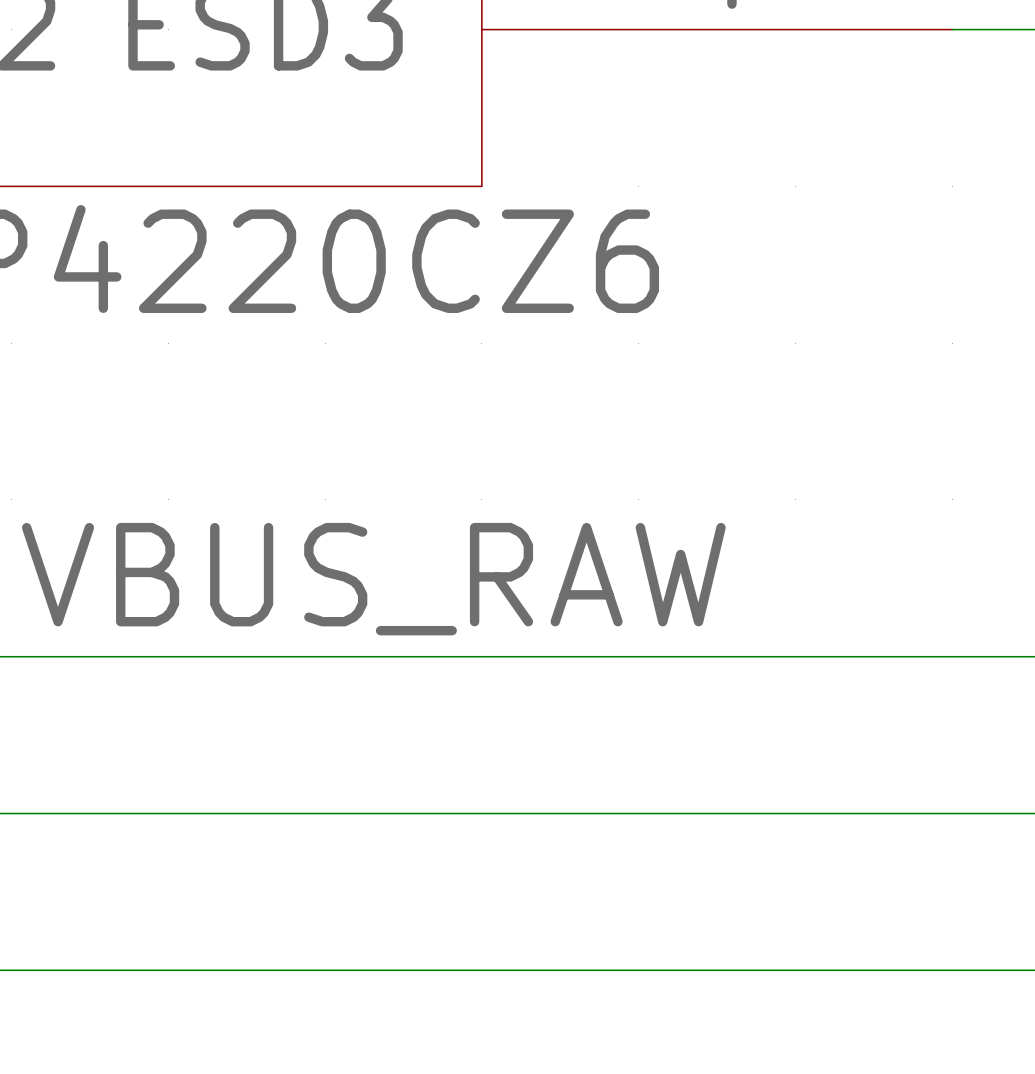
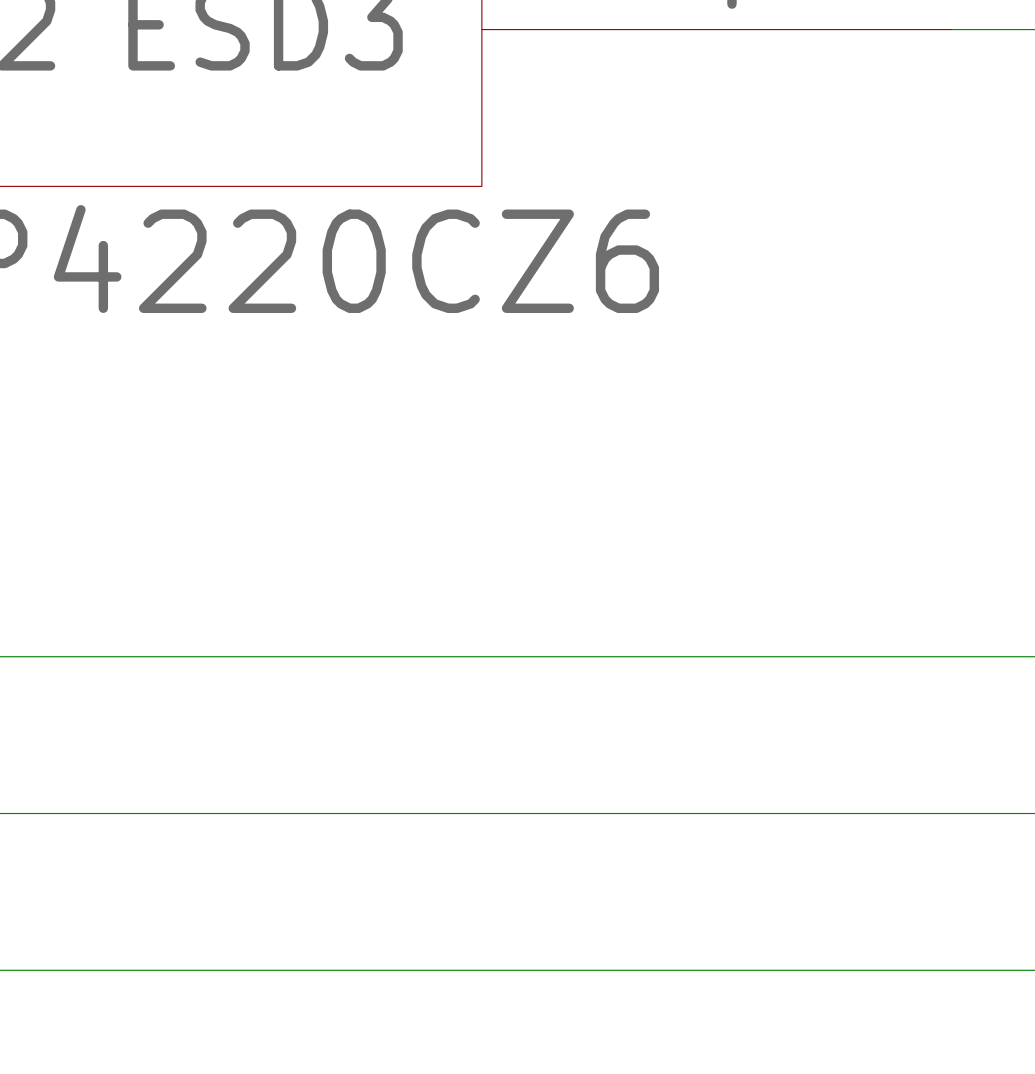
label: VBUS_RAW (373, 579) -> none

